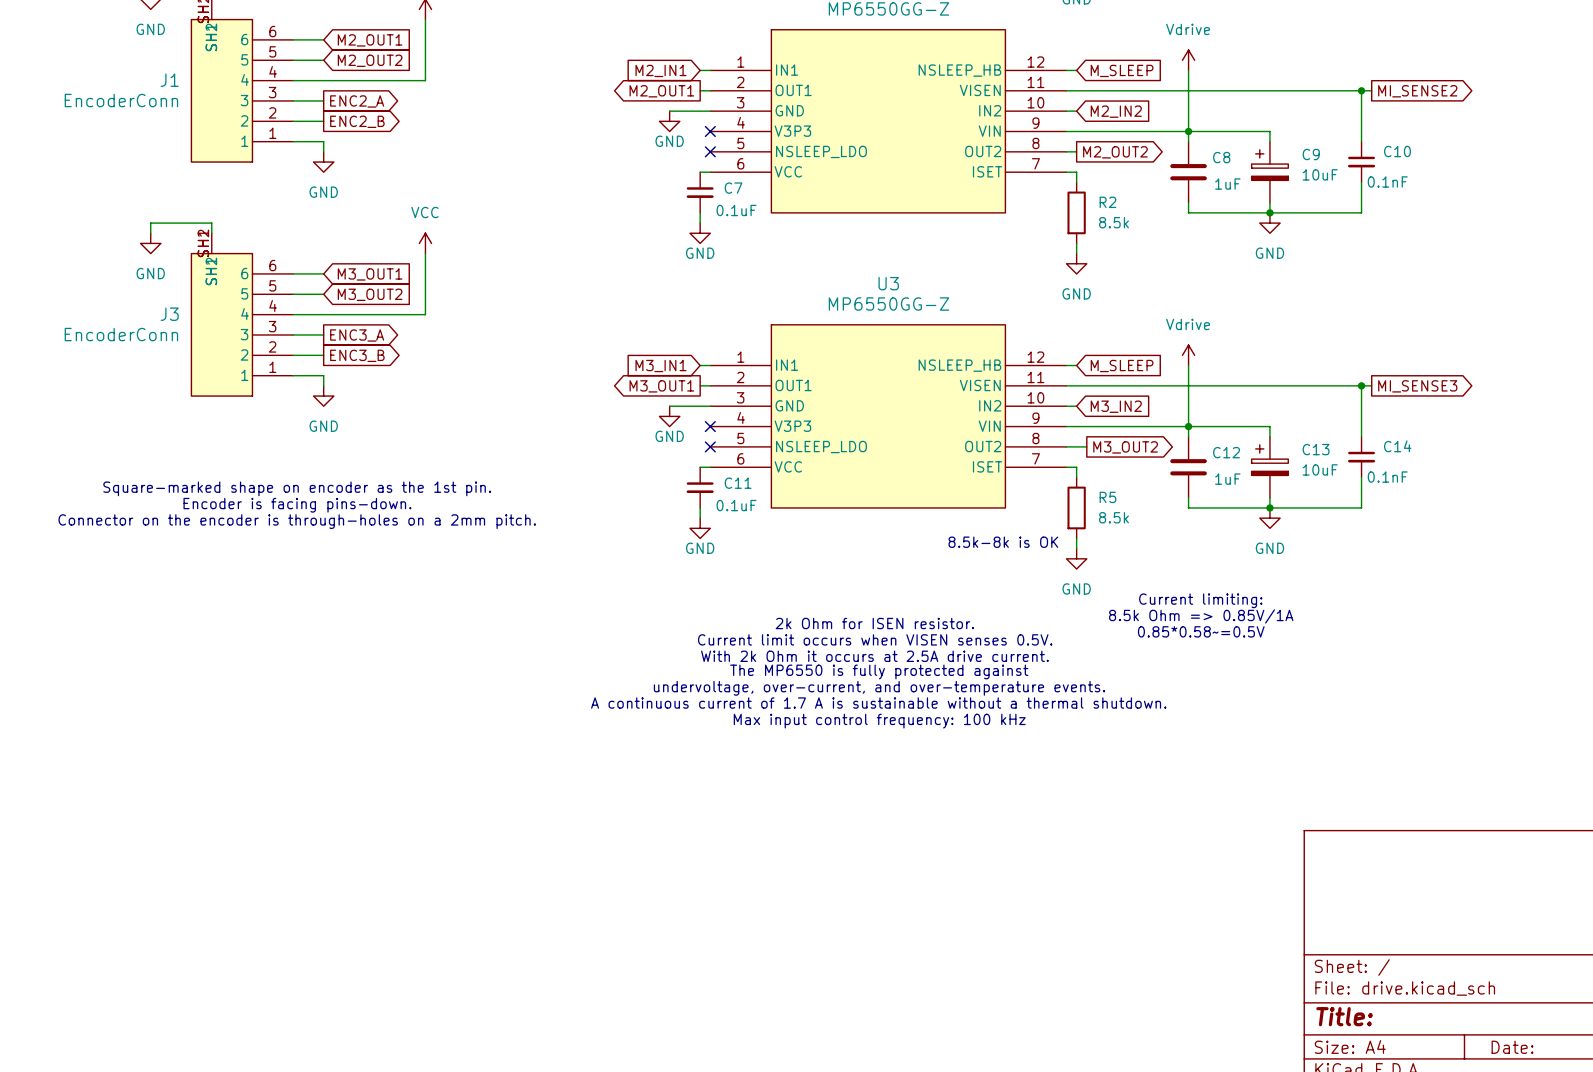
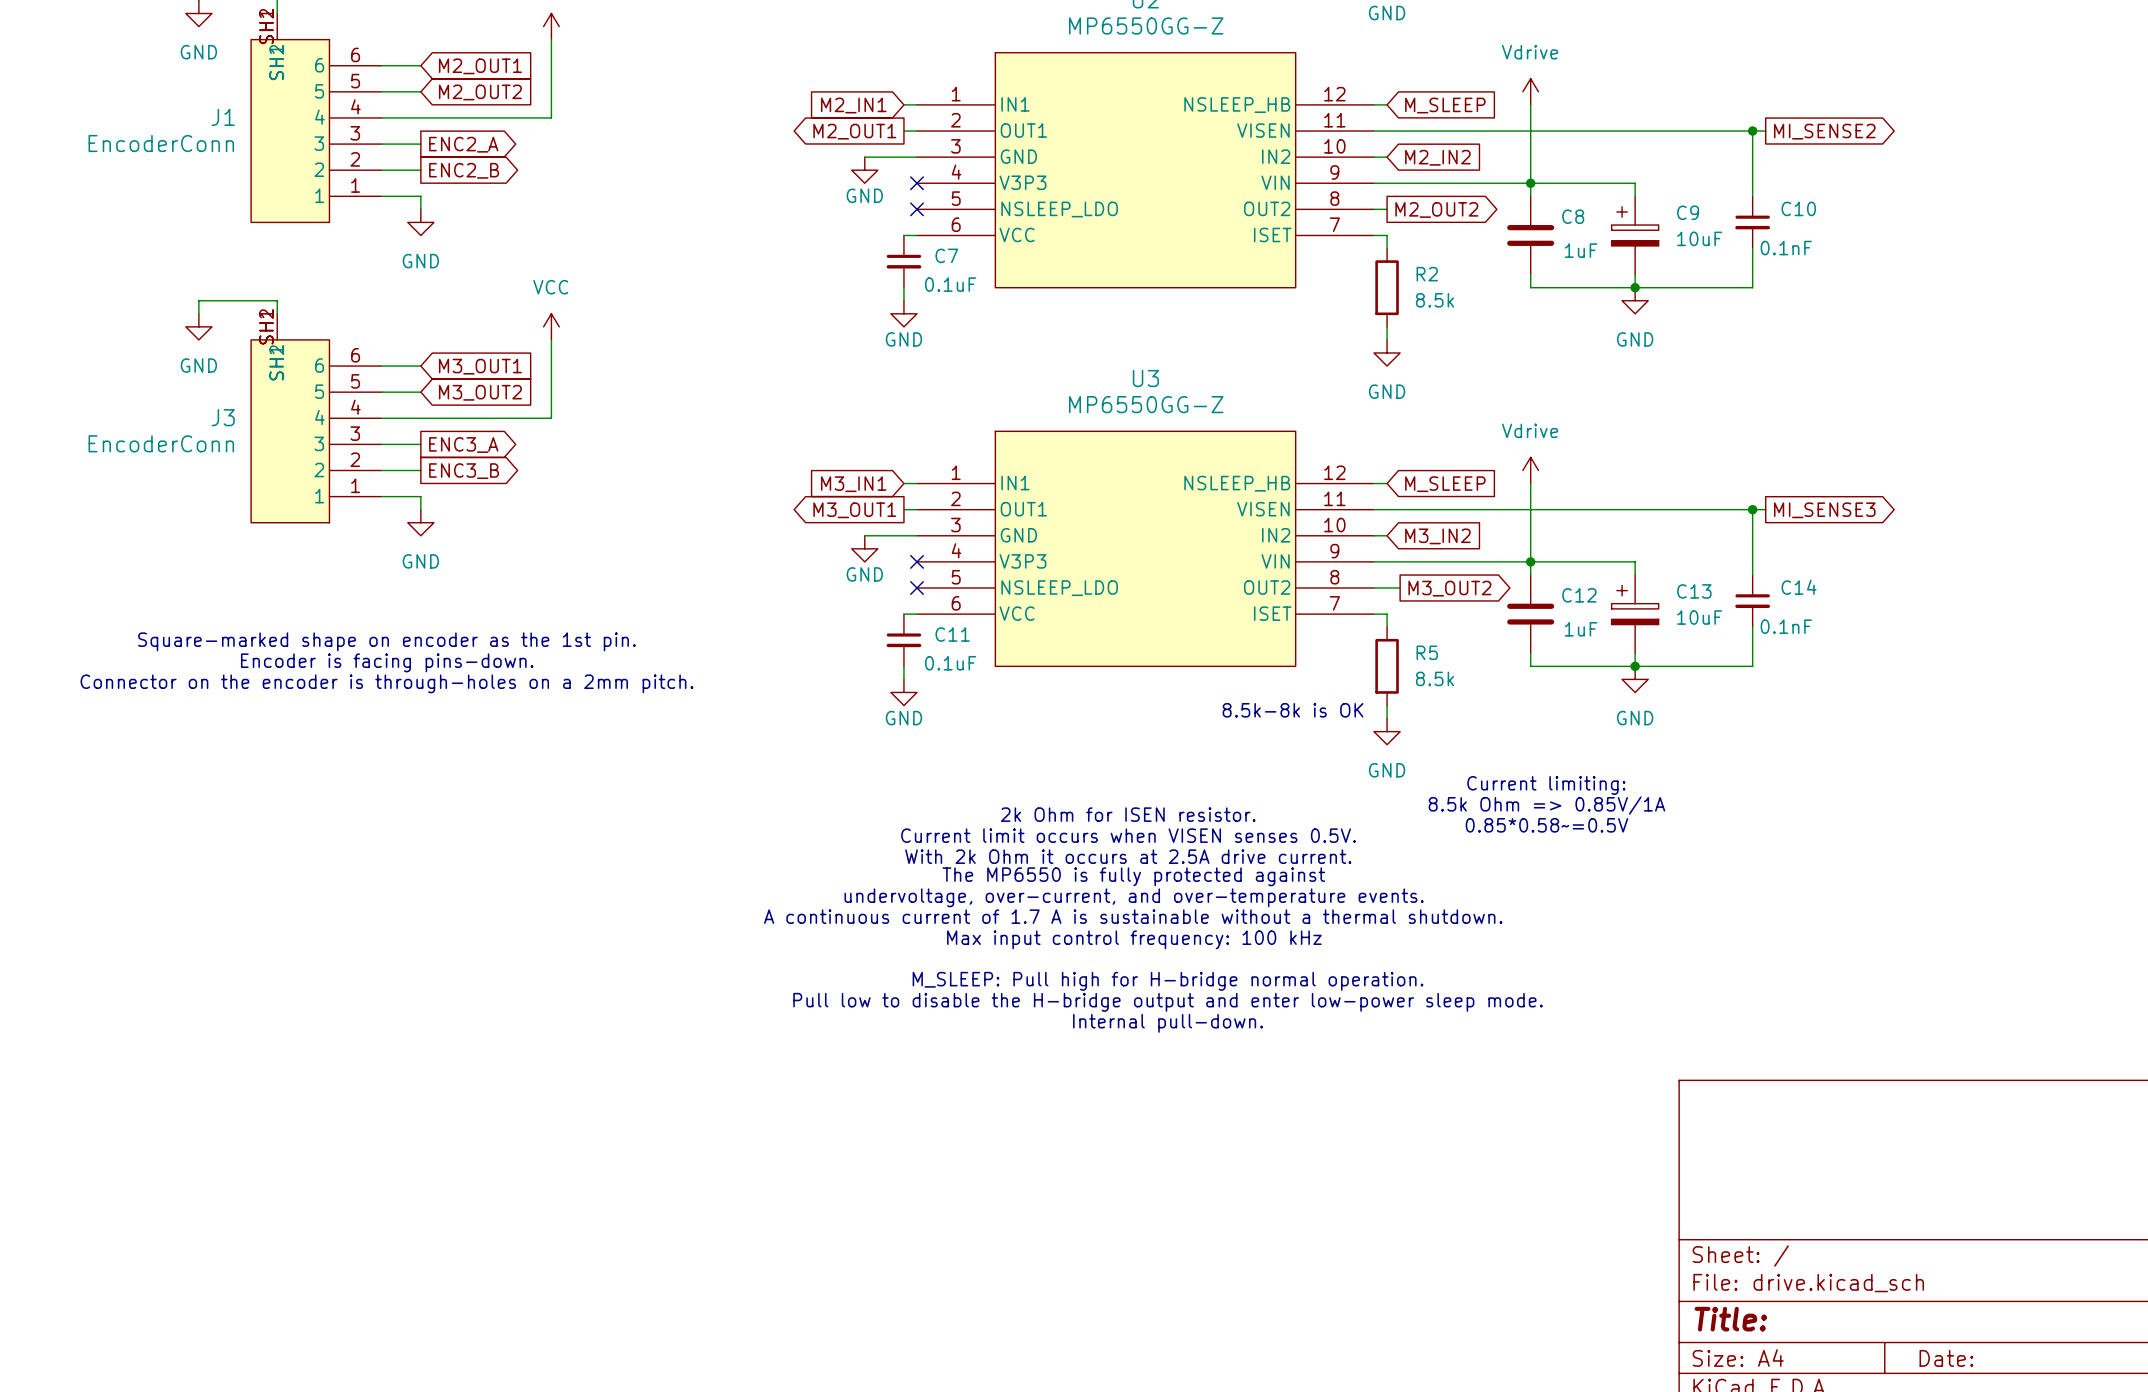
text: none -> M_SLEEP: Pull high for H-bridge normal operation. (1168, 981)
text: none -> Pull low to disable the H-bridge output and enter low-power sleep mode. (1168, 1002)
text: none -> Internal pull-down. (1168, 1023)

